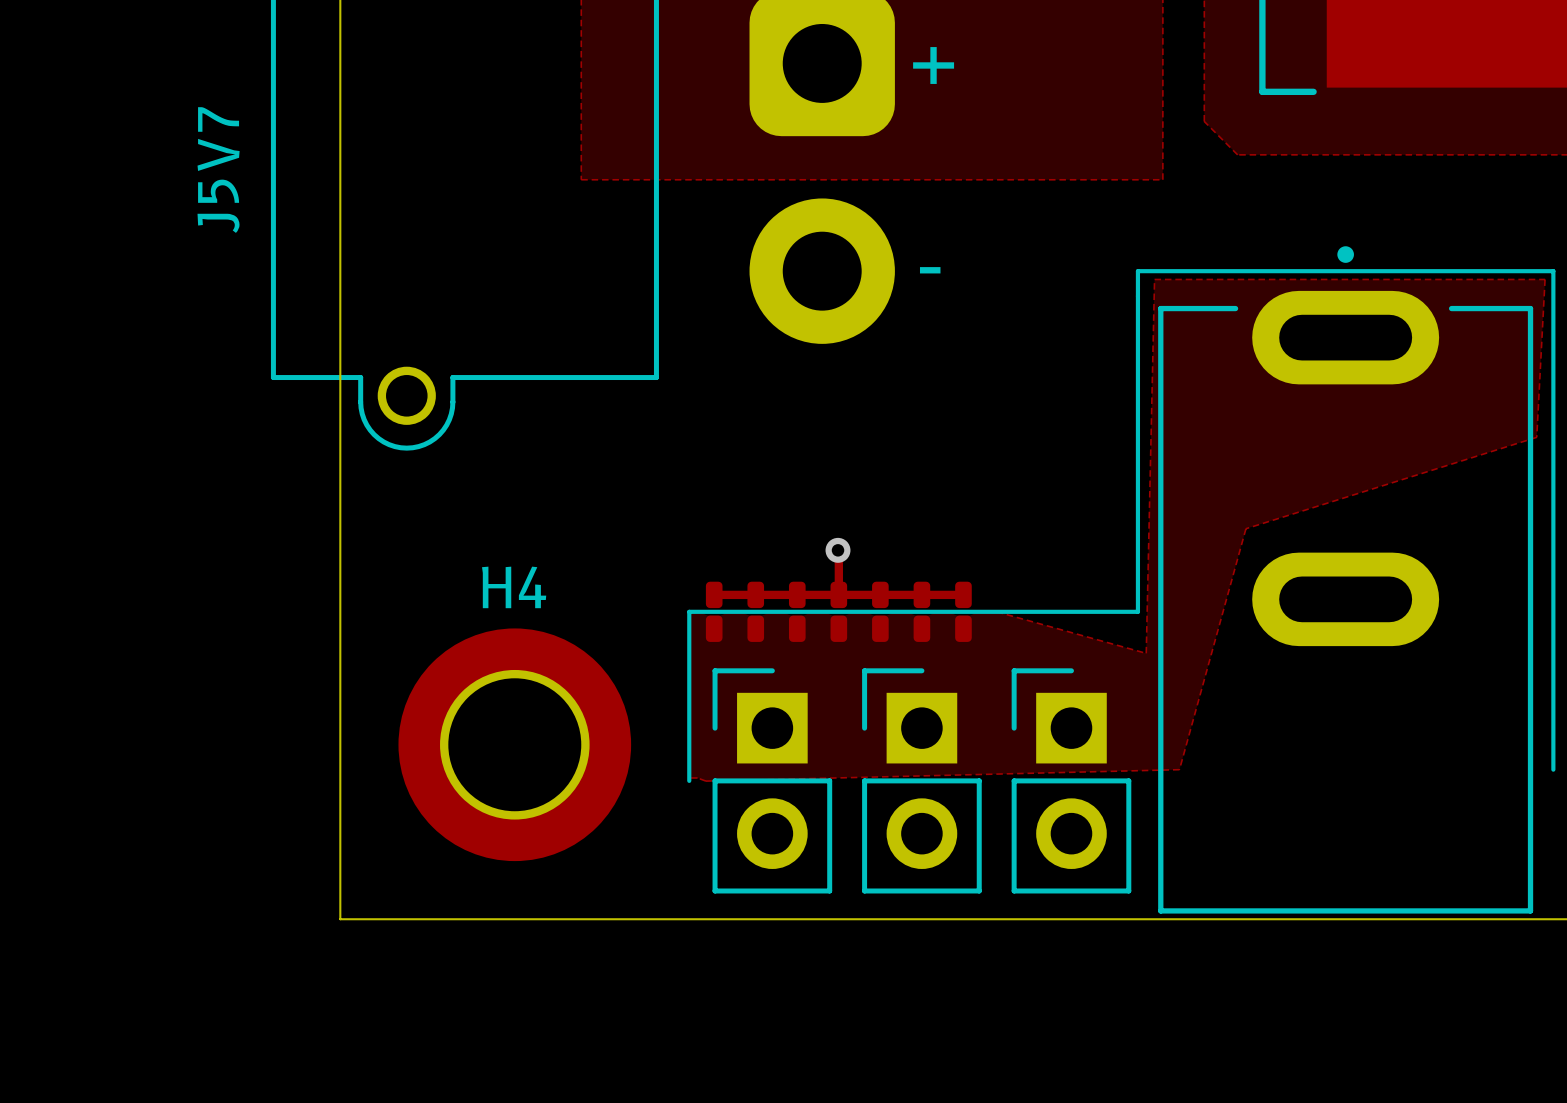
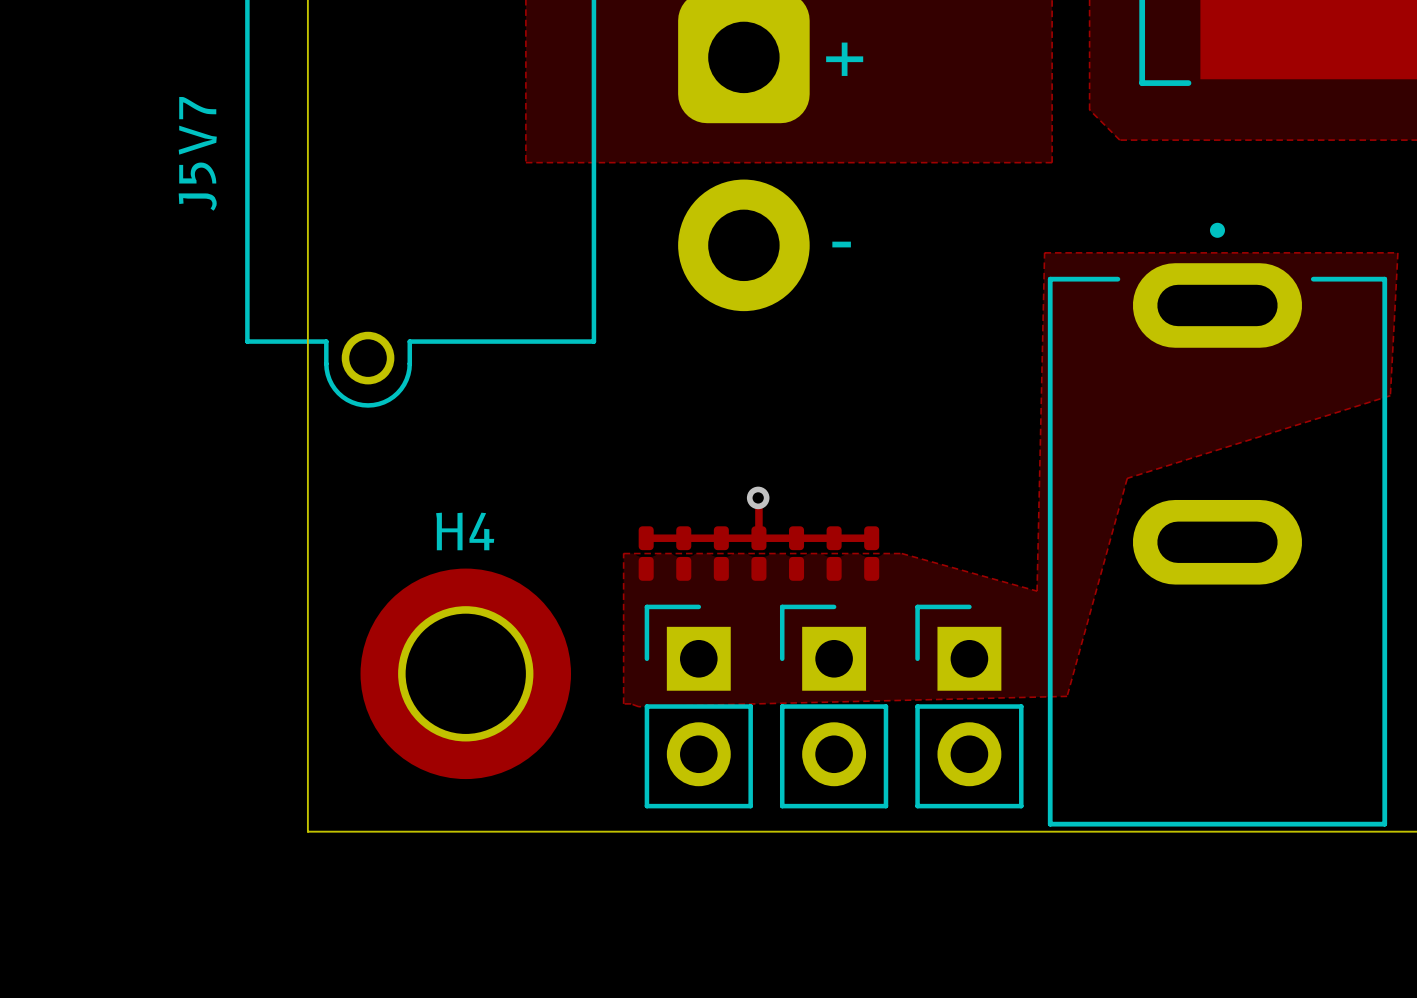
line: (1553, 769) (1553, 271) (1137, 271) (1137, 611) (689, 611) (689, 780) -> none

